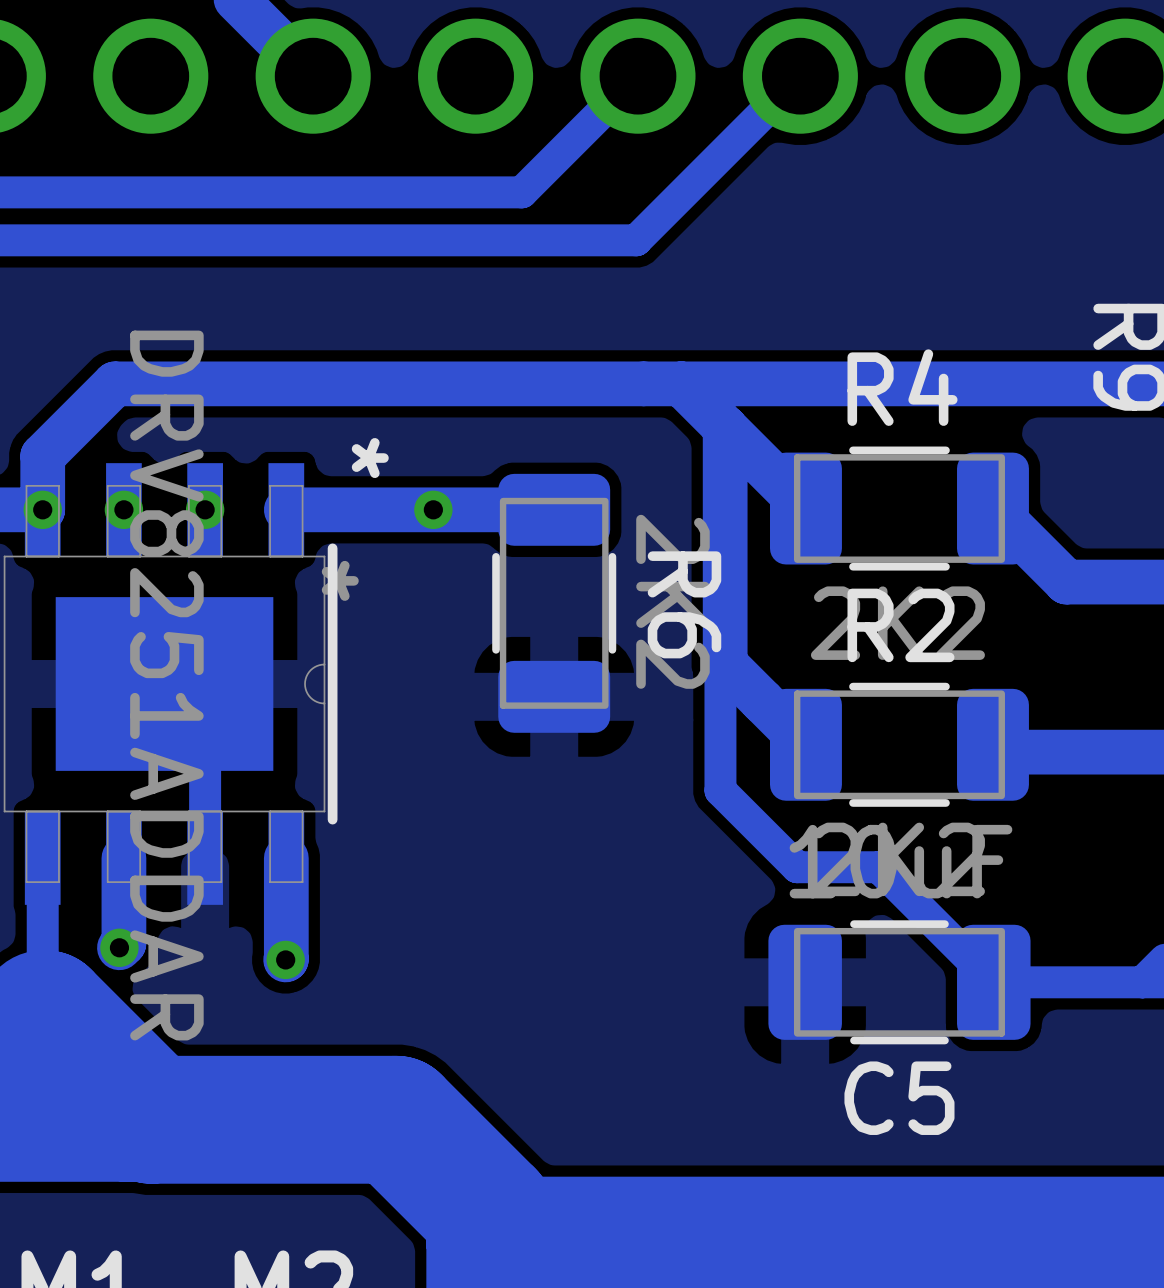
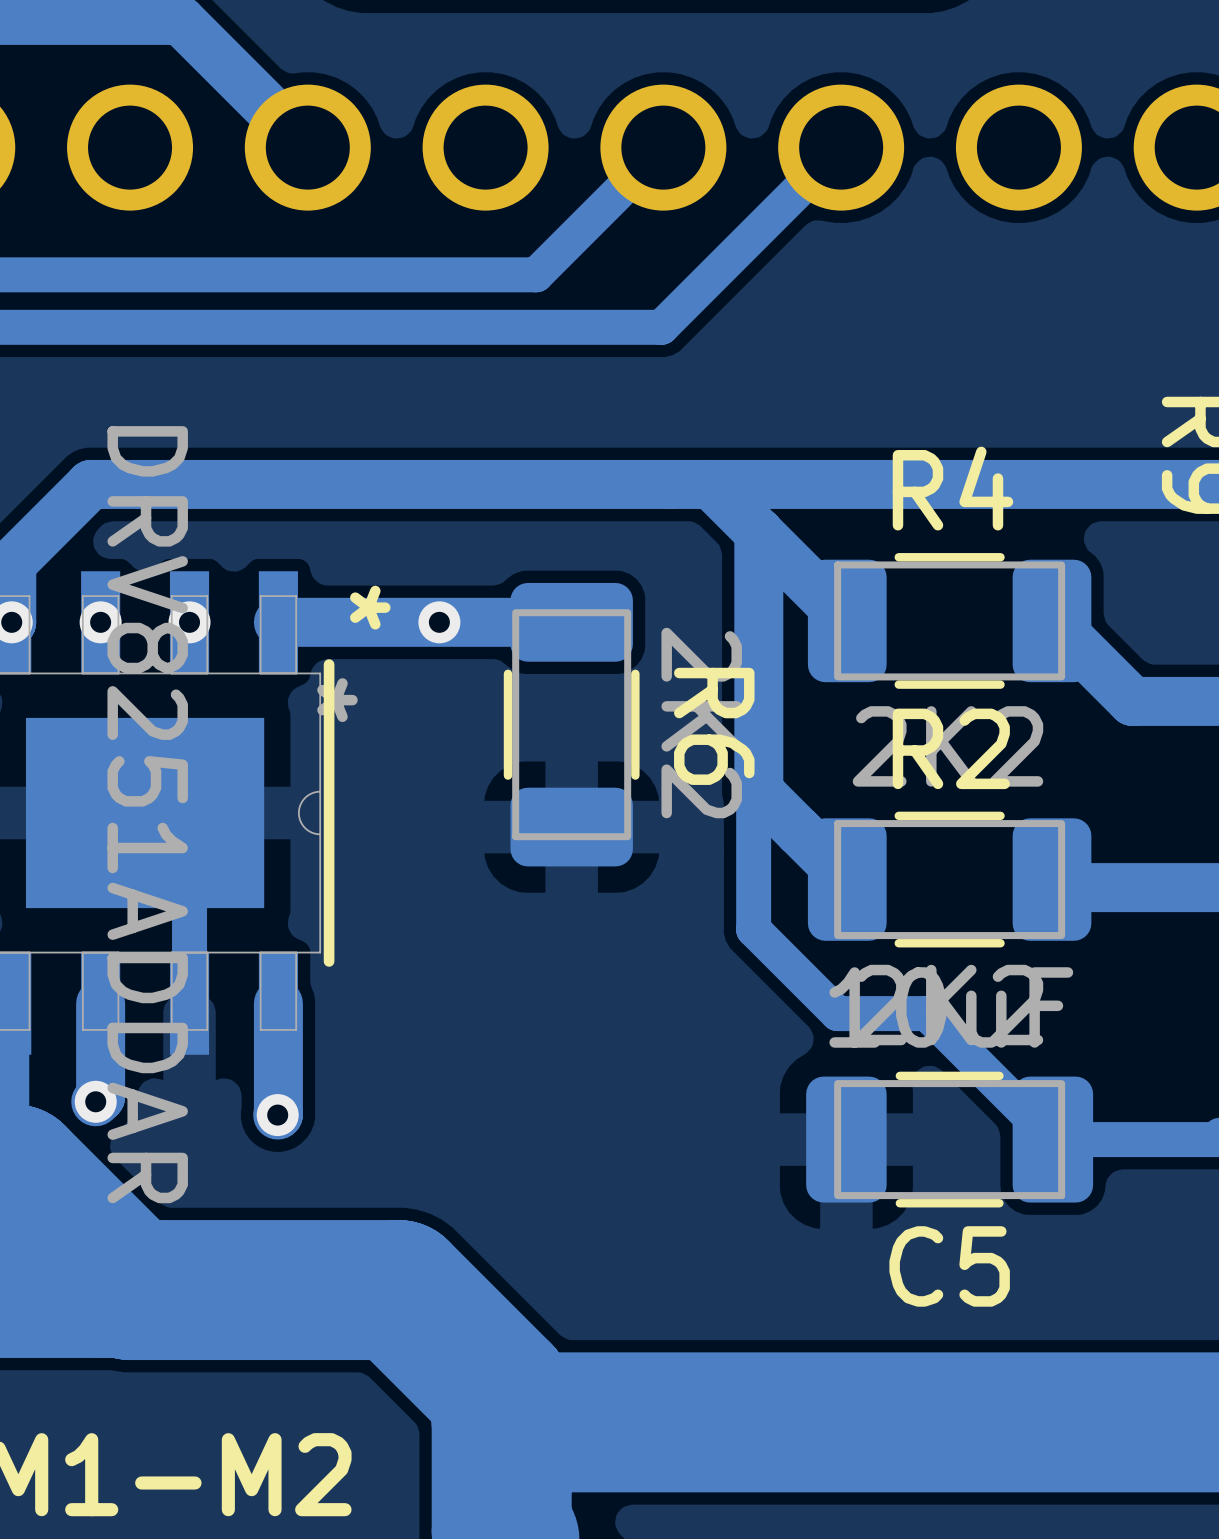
part text position: * (370, 458) -> * (370, 607)

